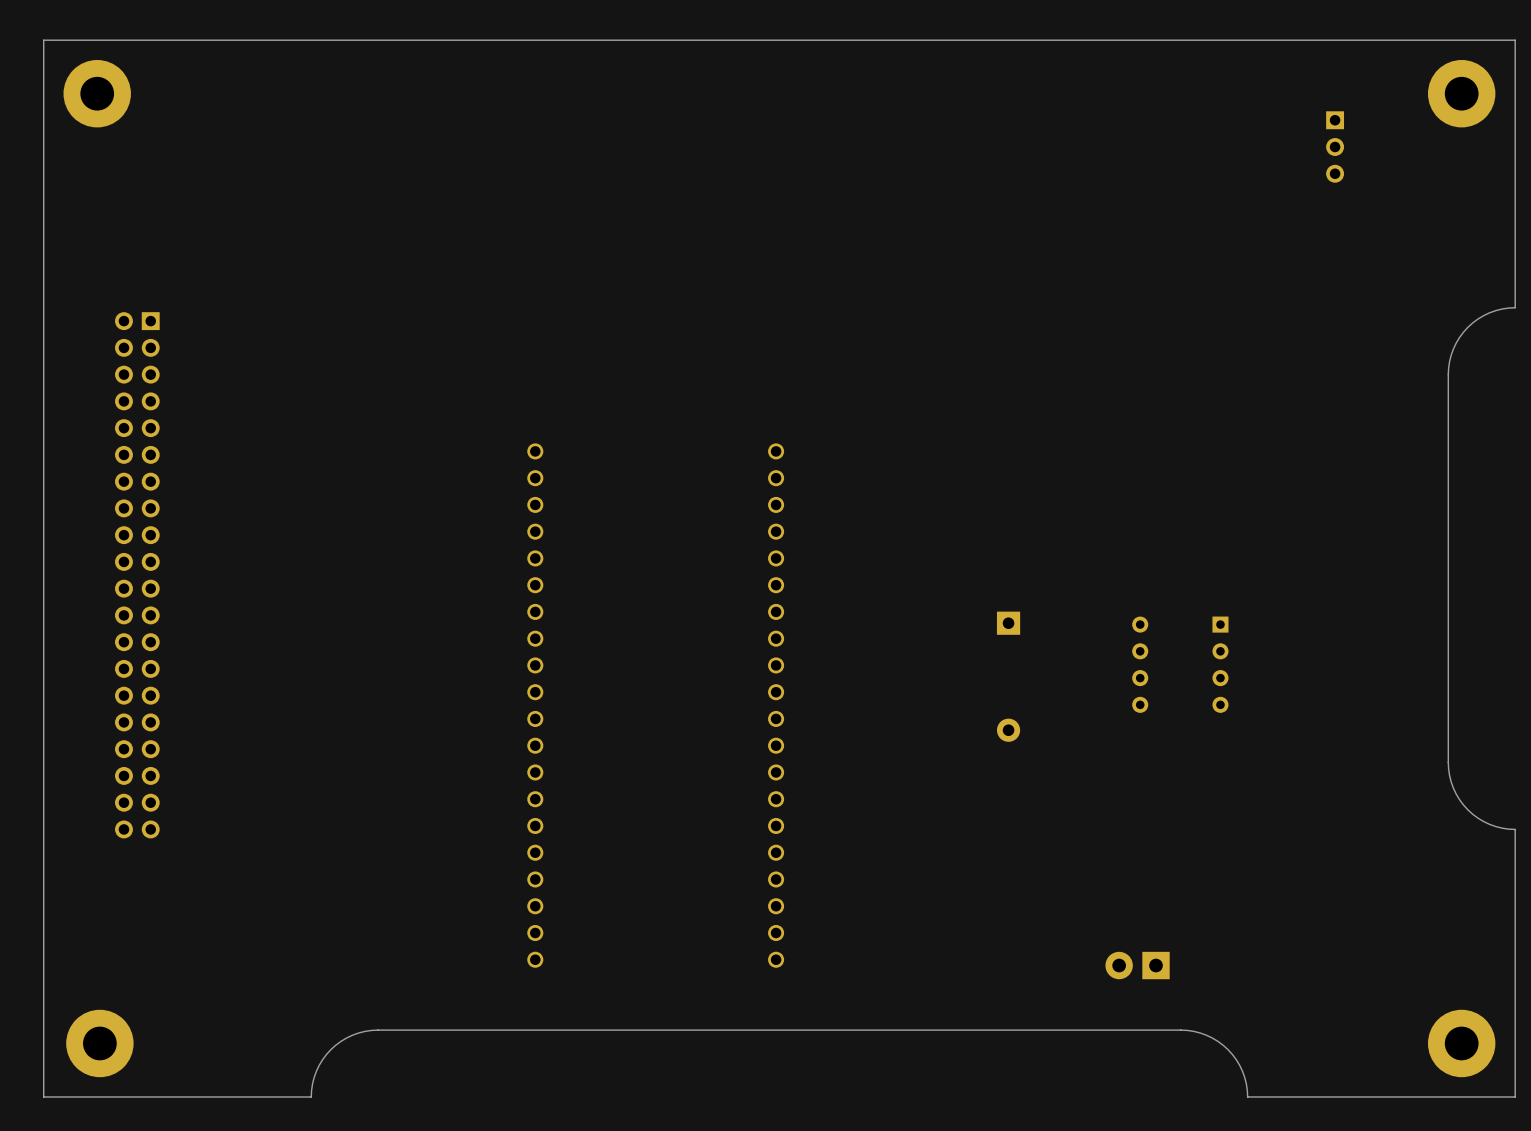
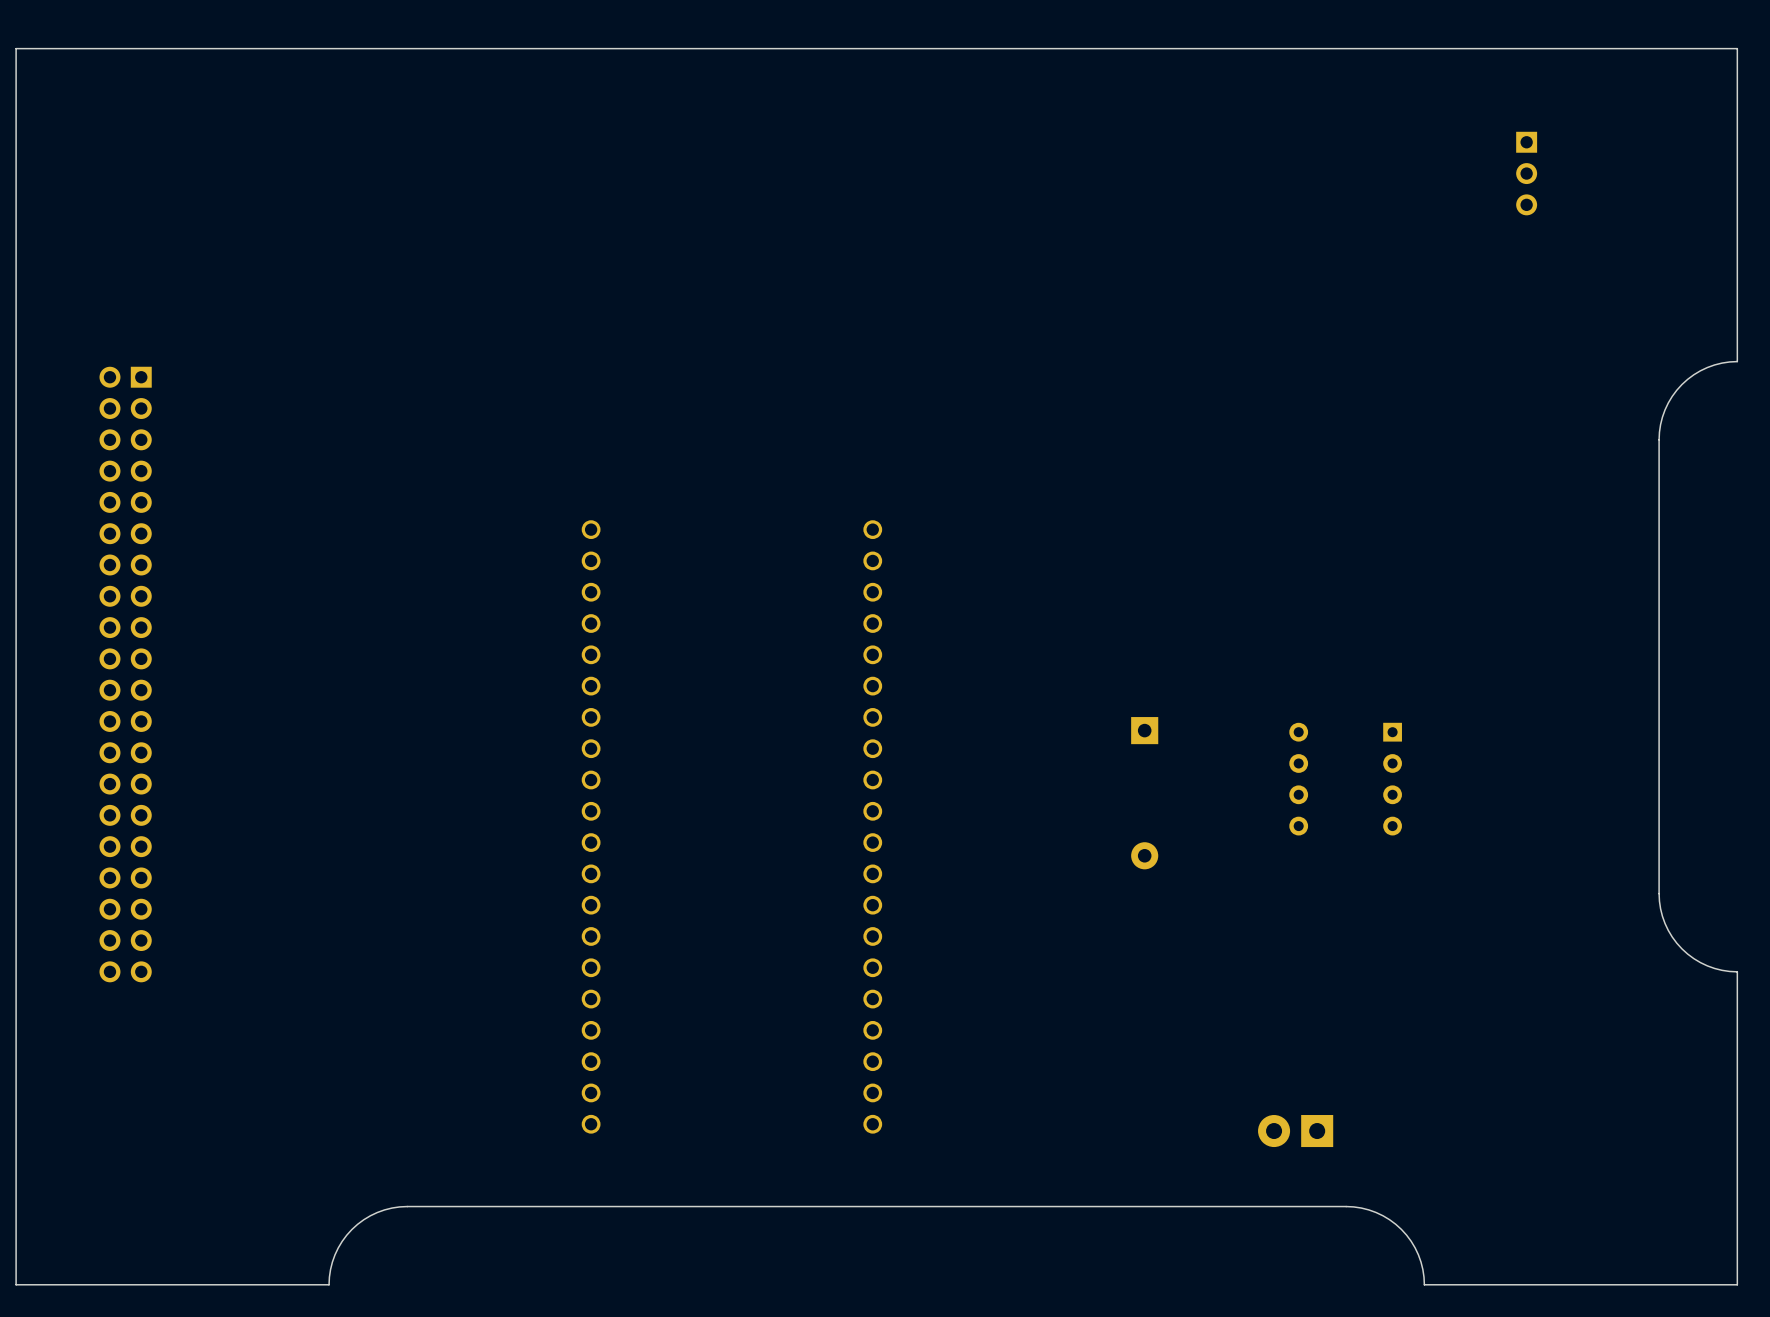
part: (97, 93) -> none
part: (1461, 93) -> none
part: (99, 1043) -> none
part: (1461, 1043) -> none

